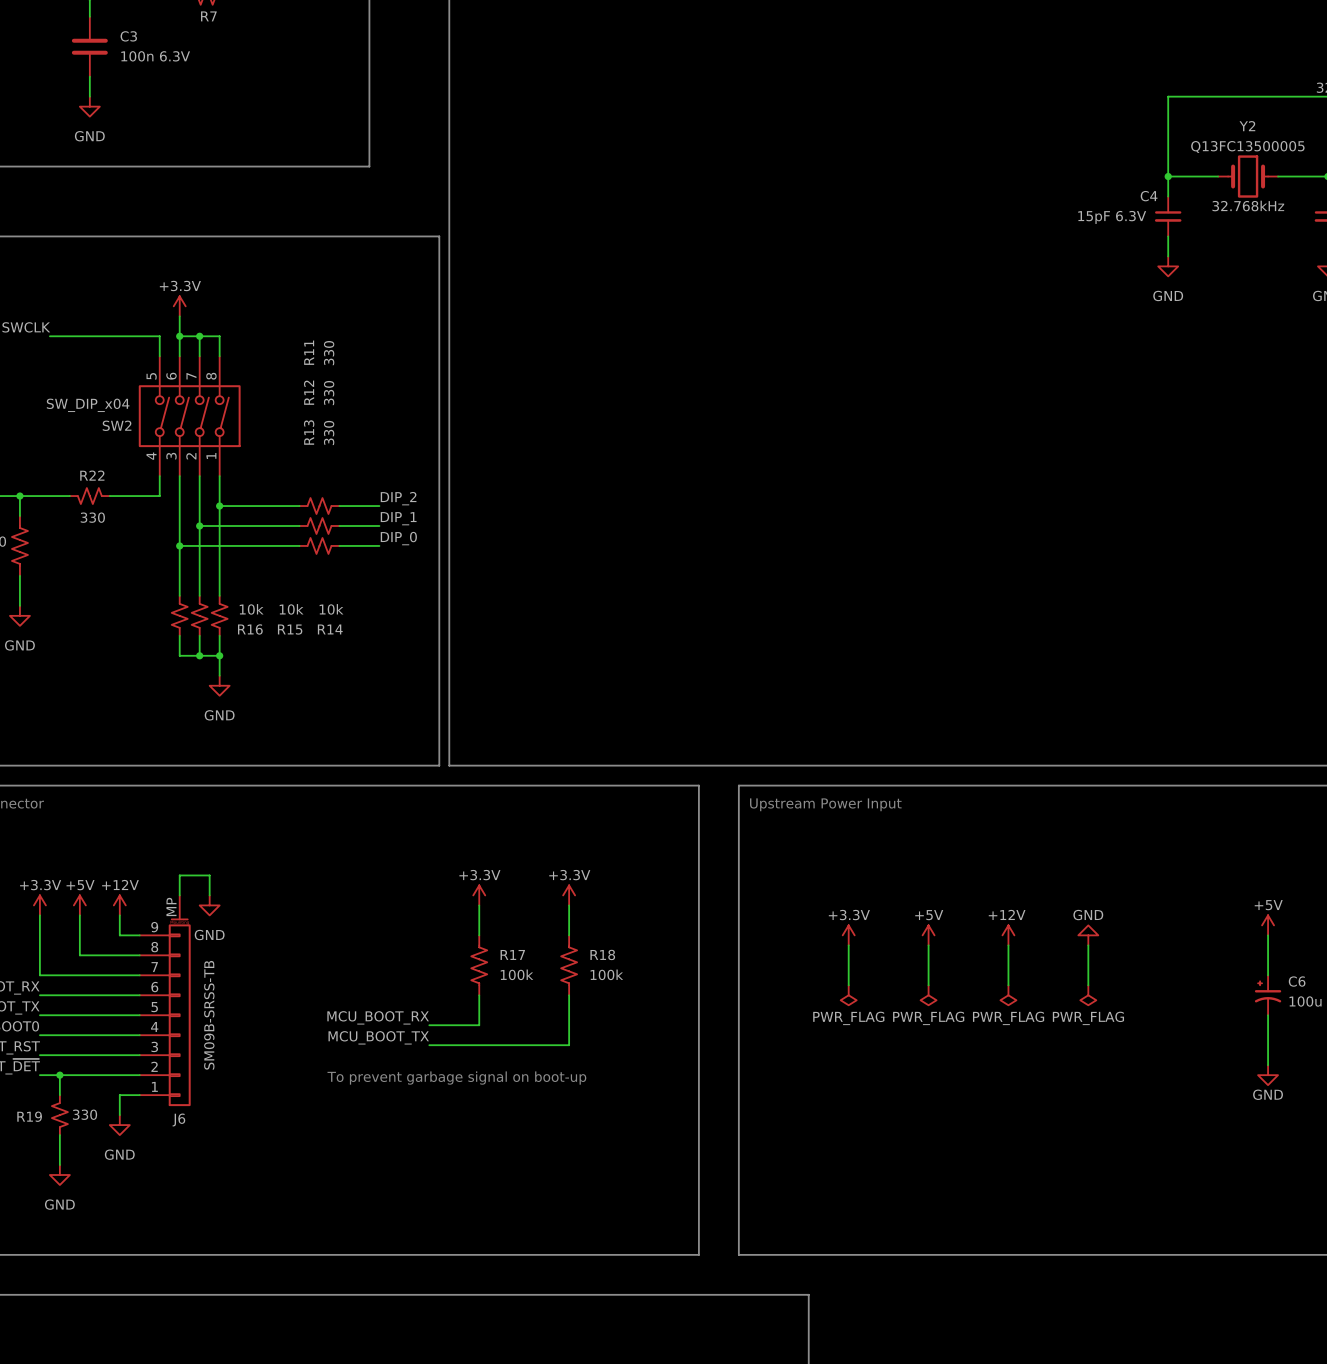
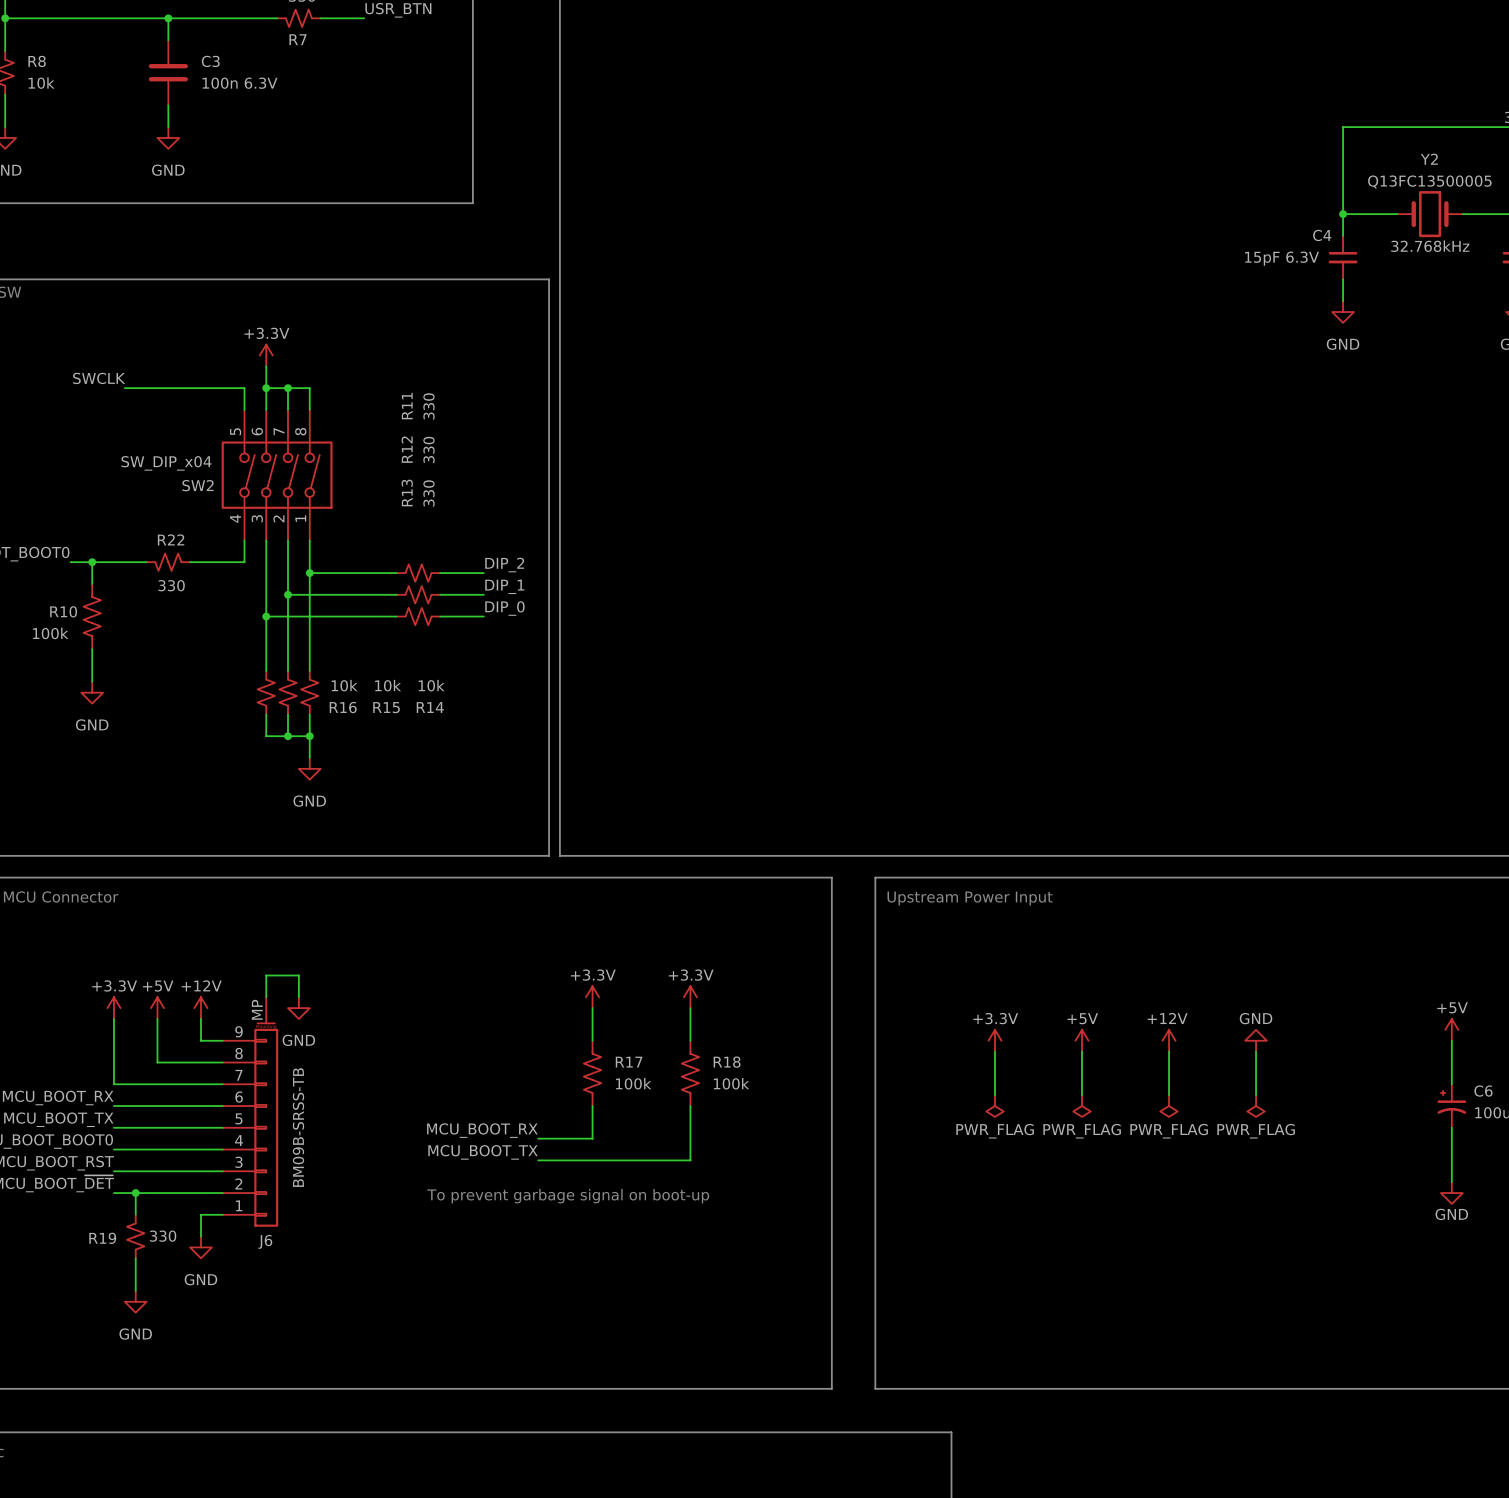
J6 value: SM09B-SRSS-TB (209, 1015) -> BM09B-SRSS-TB (298, 1127)

